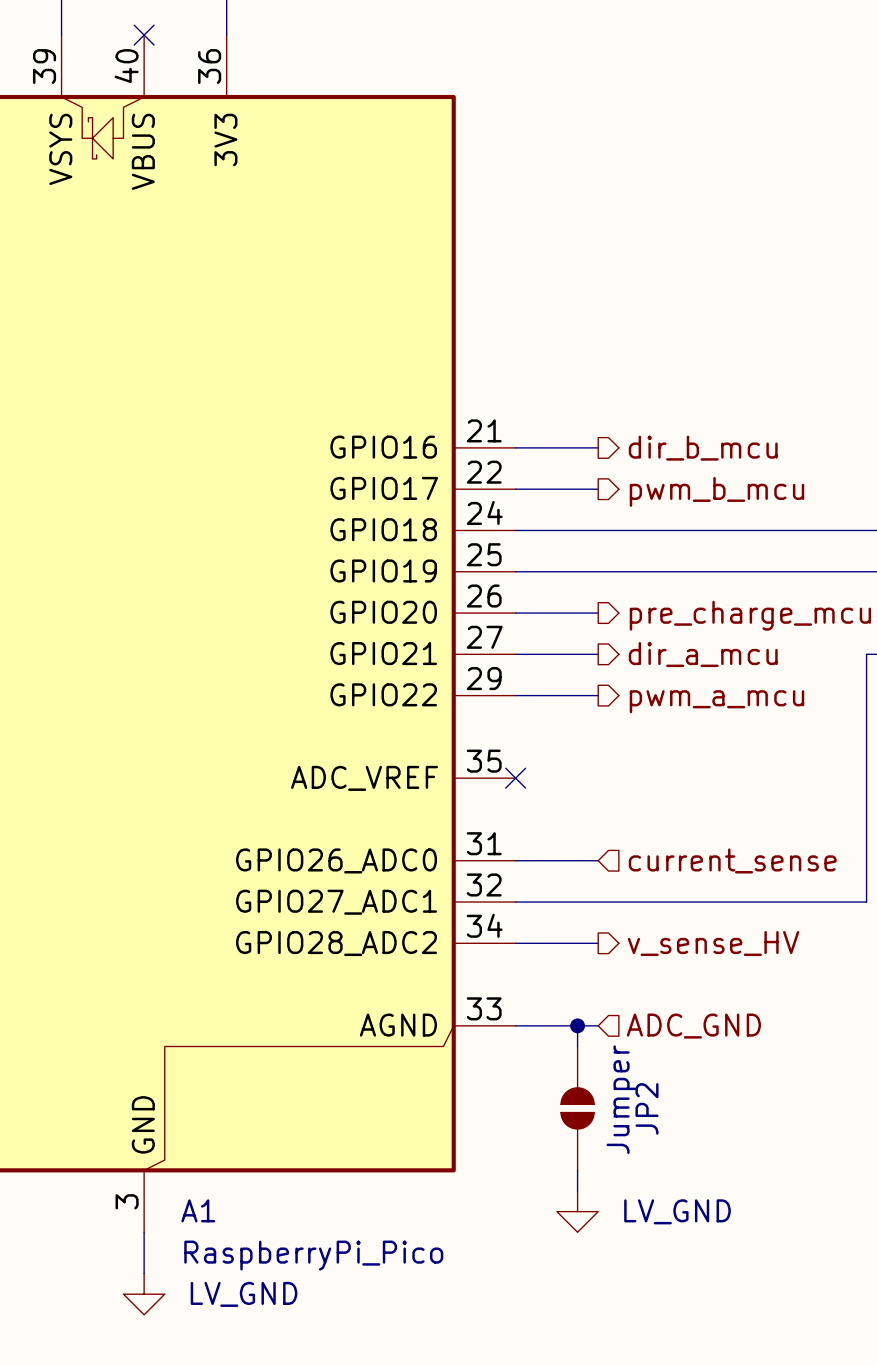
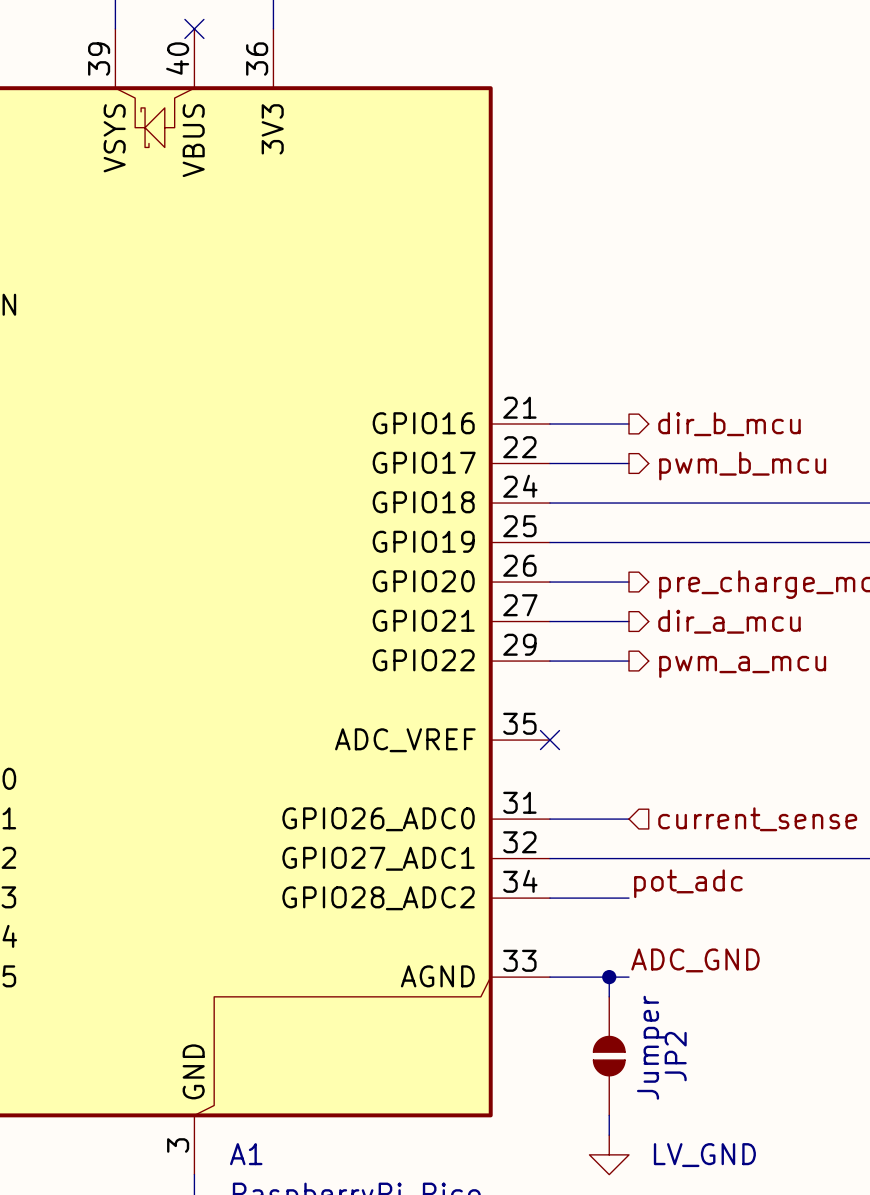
label: none -> pot_adc (688, 883)
hierarchical label: v_sense_HV (713, 943) -> none
label: none -> ADC_GND (695, 960)
hierarchical label: ADC_GND (693, 1026) -> none

